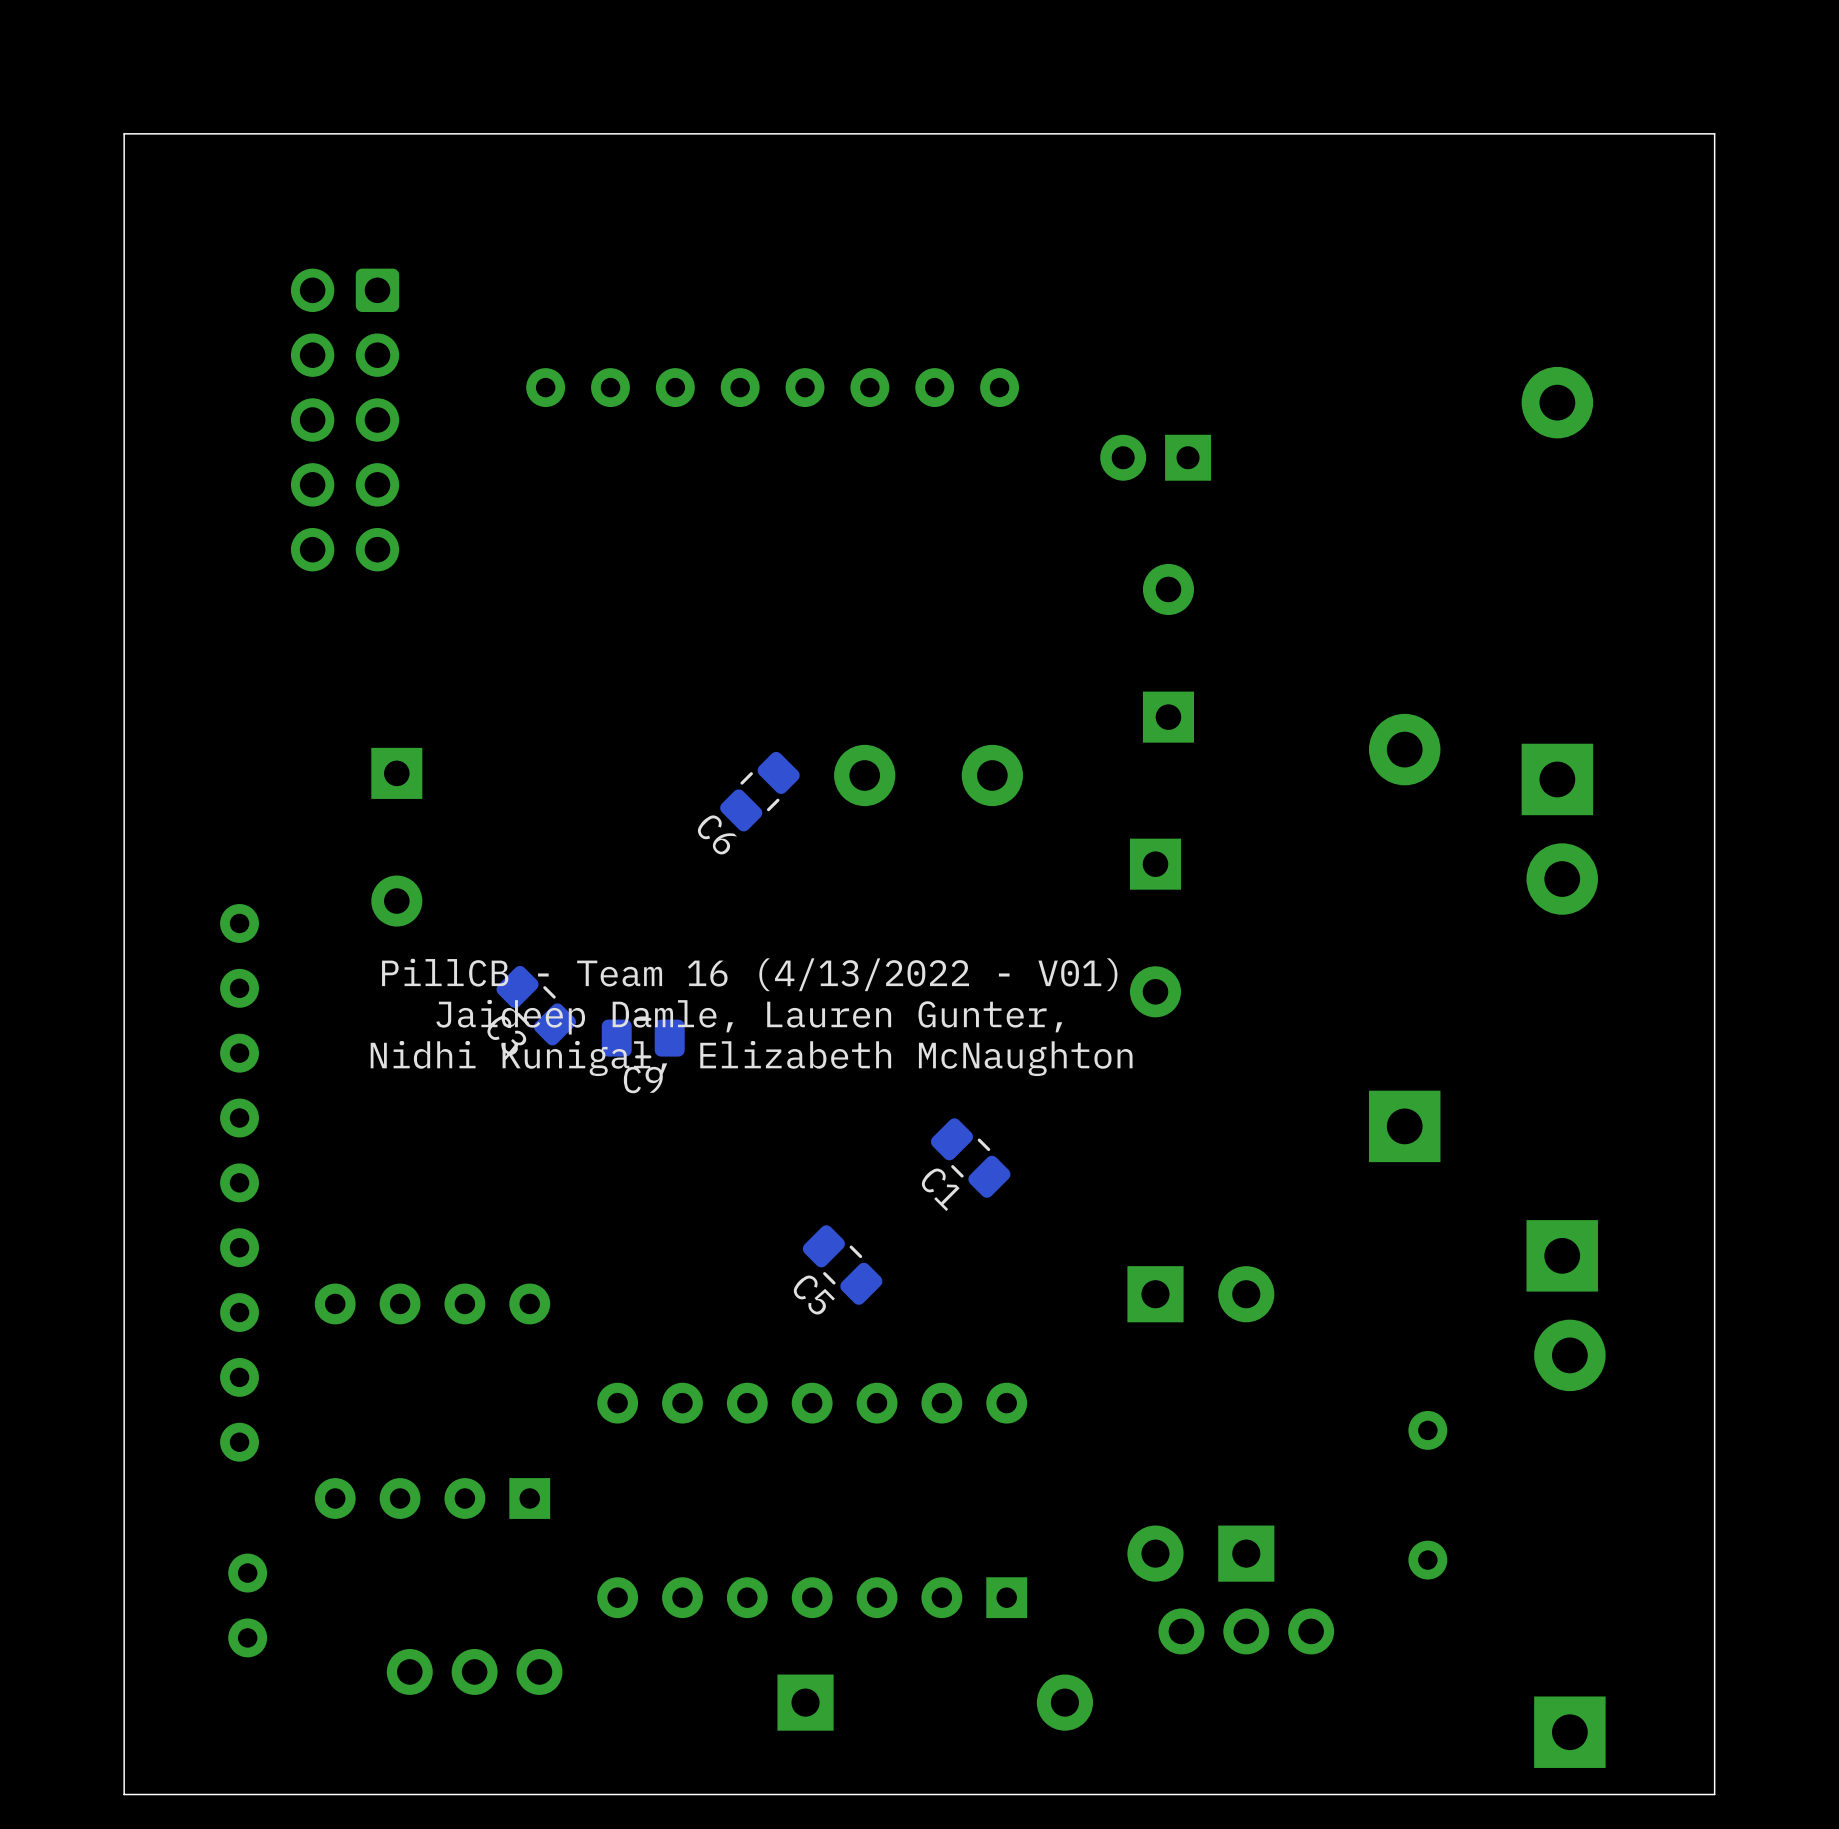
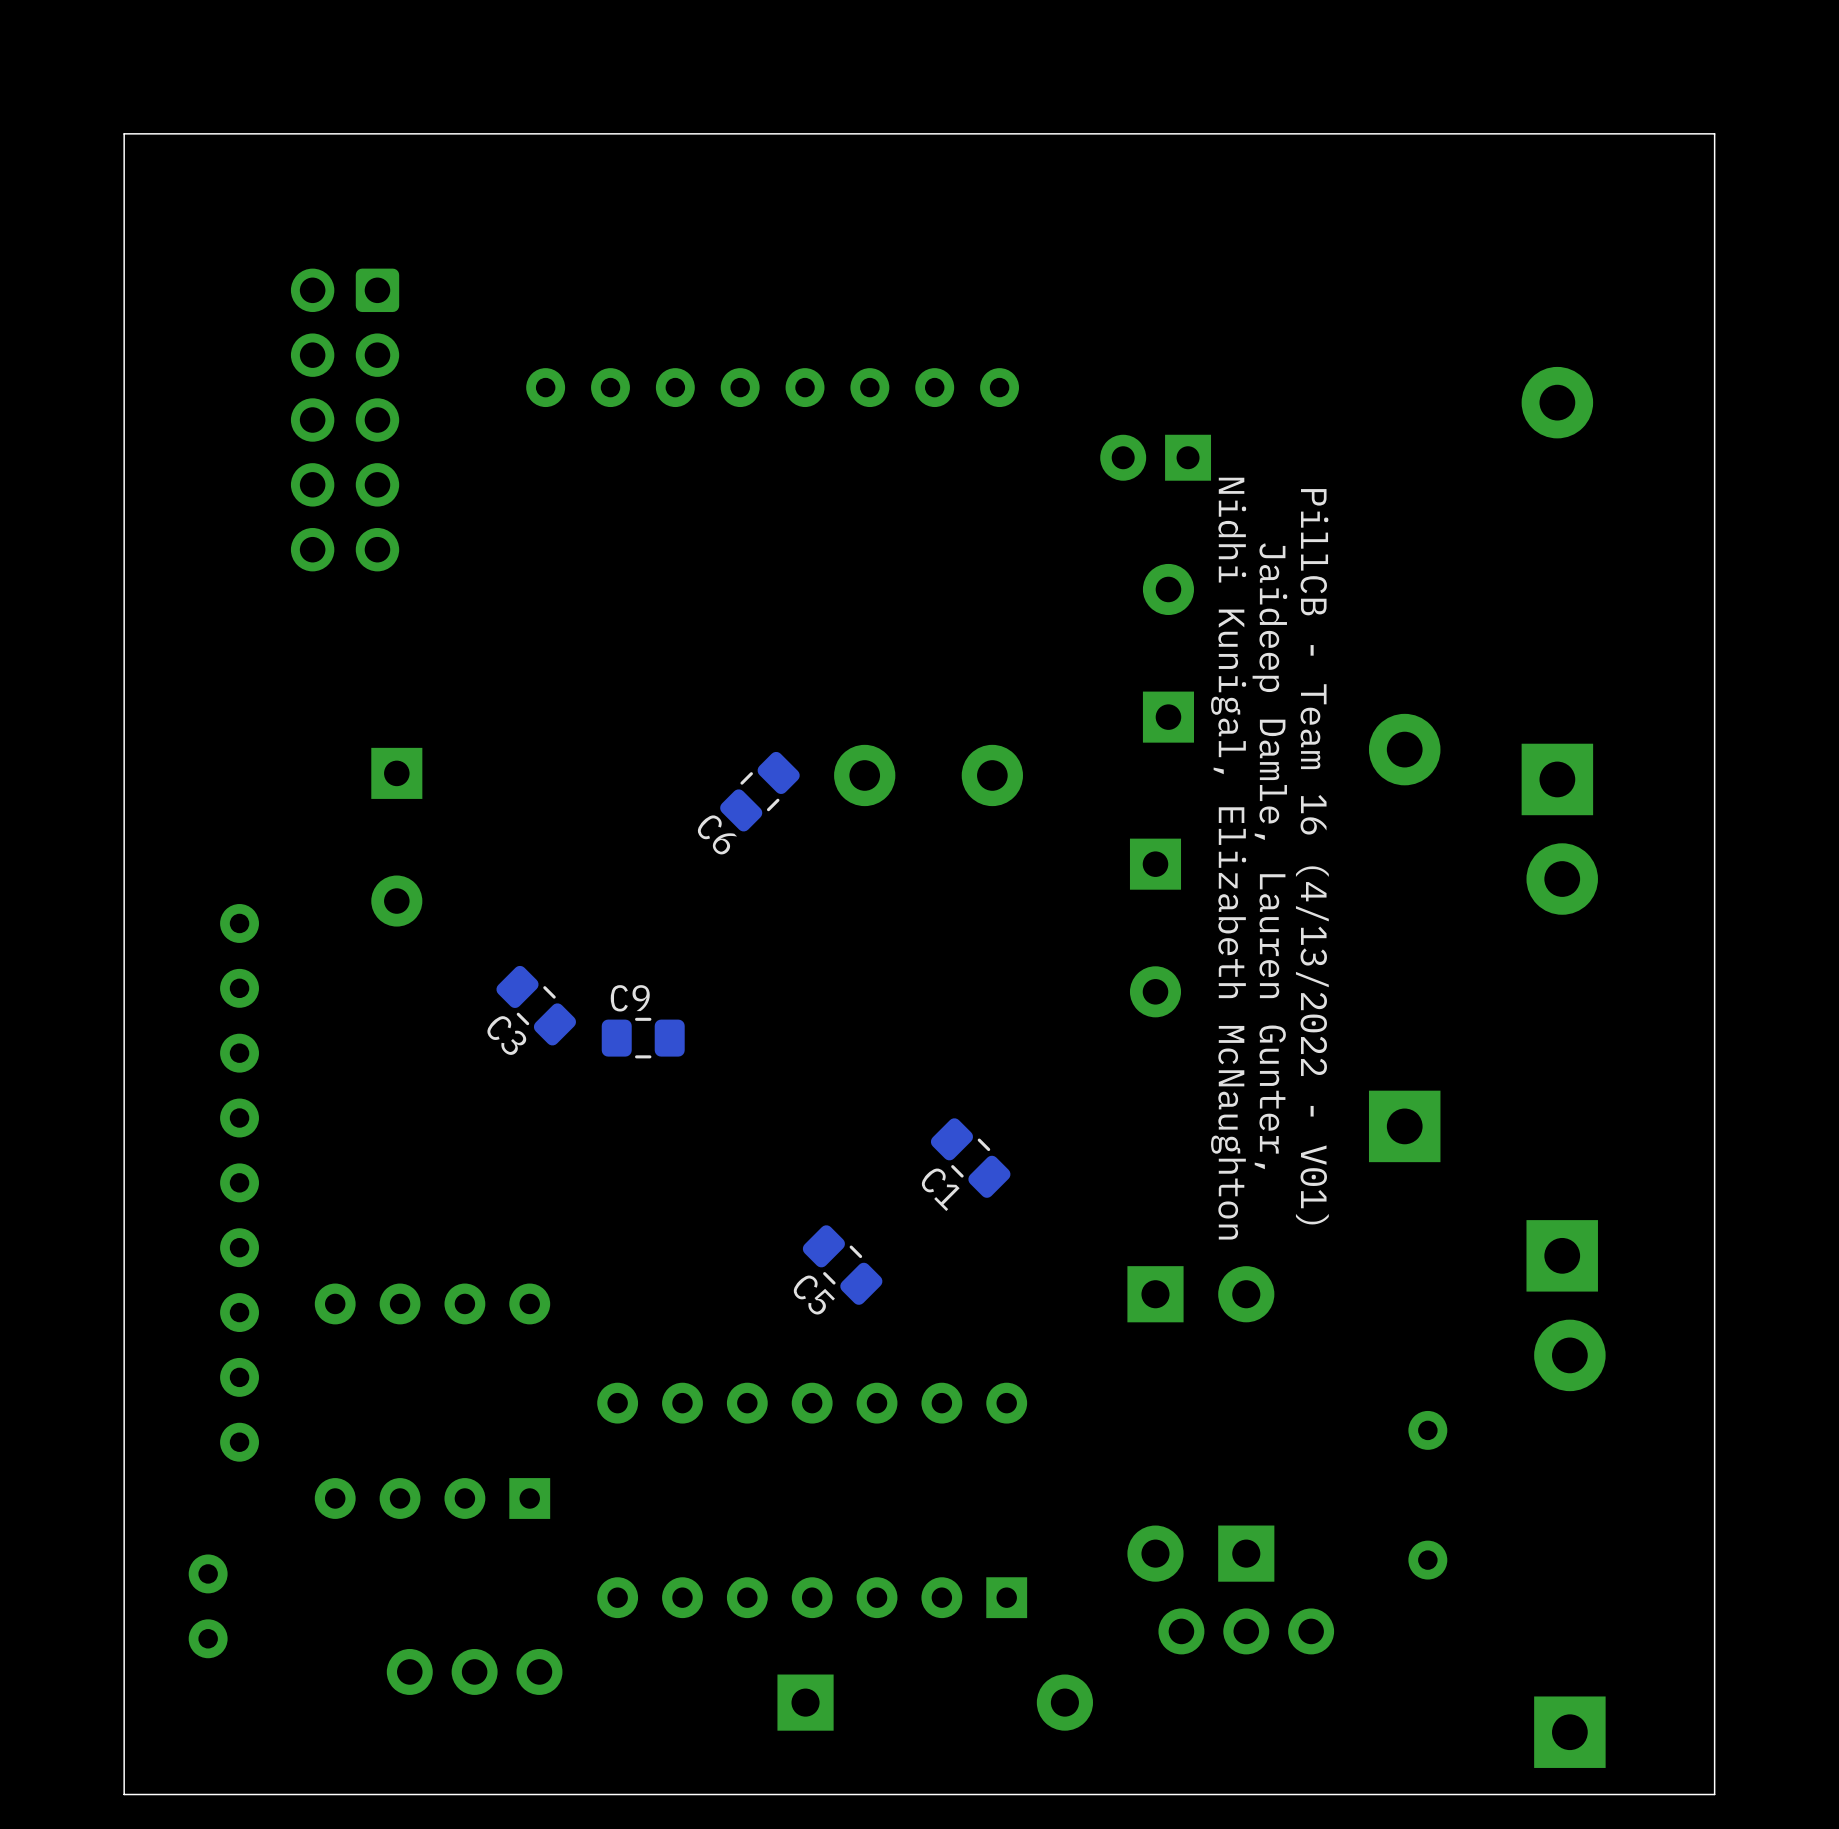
text rotation: 0° (749, 974) -> 90° clockwise (1312, 856)
text rotation: 0° (749, 1017) -> 90° clockwise (1269, 856)
text rotation: 0° (751, 1058) -> 90° clockwise (1228, 858)
C9 name position: C9 (643, 1080) -> C9 (630, 998)
part position: (247, 1605) -> (208, 1606)

